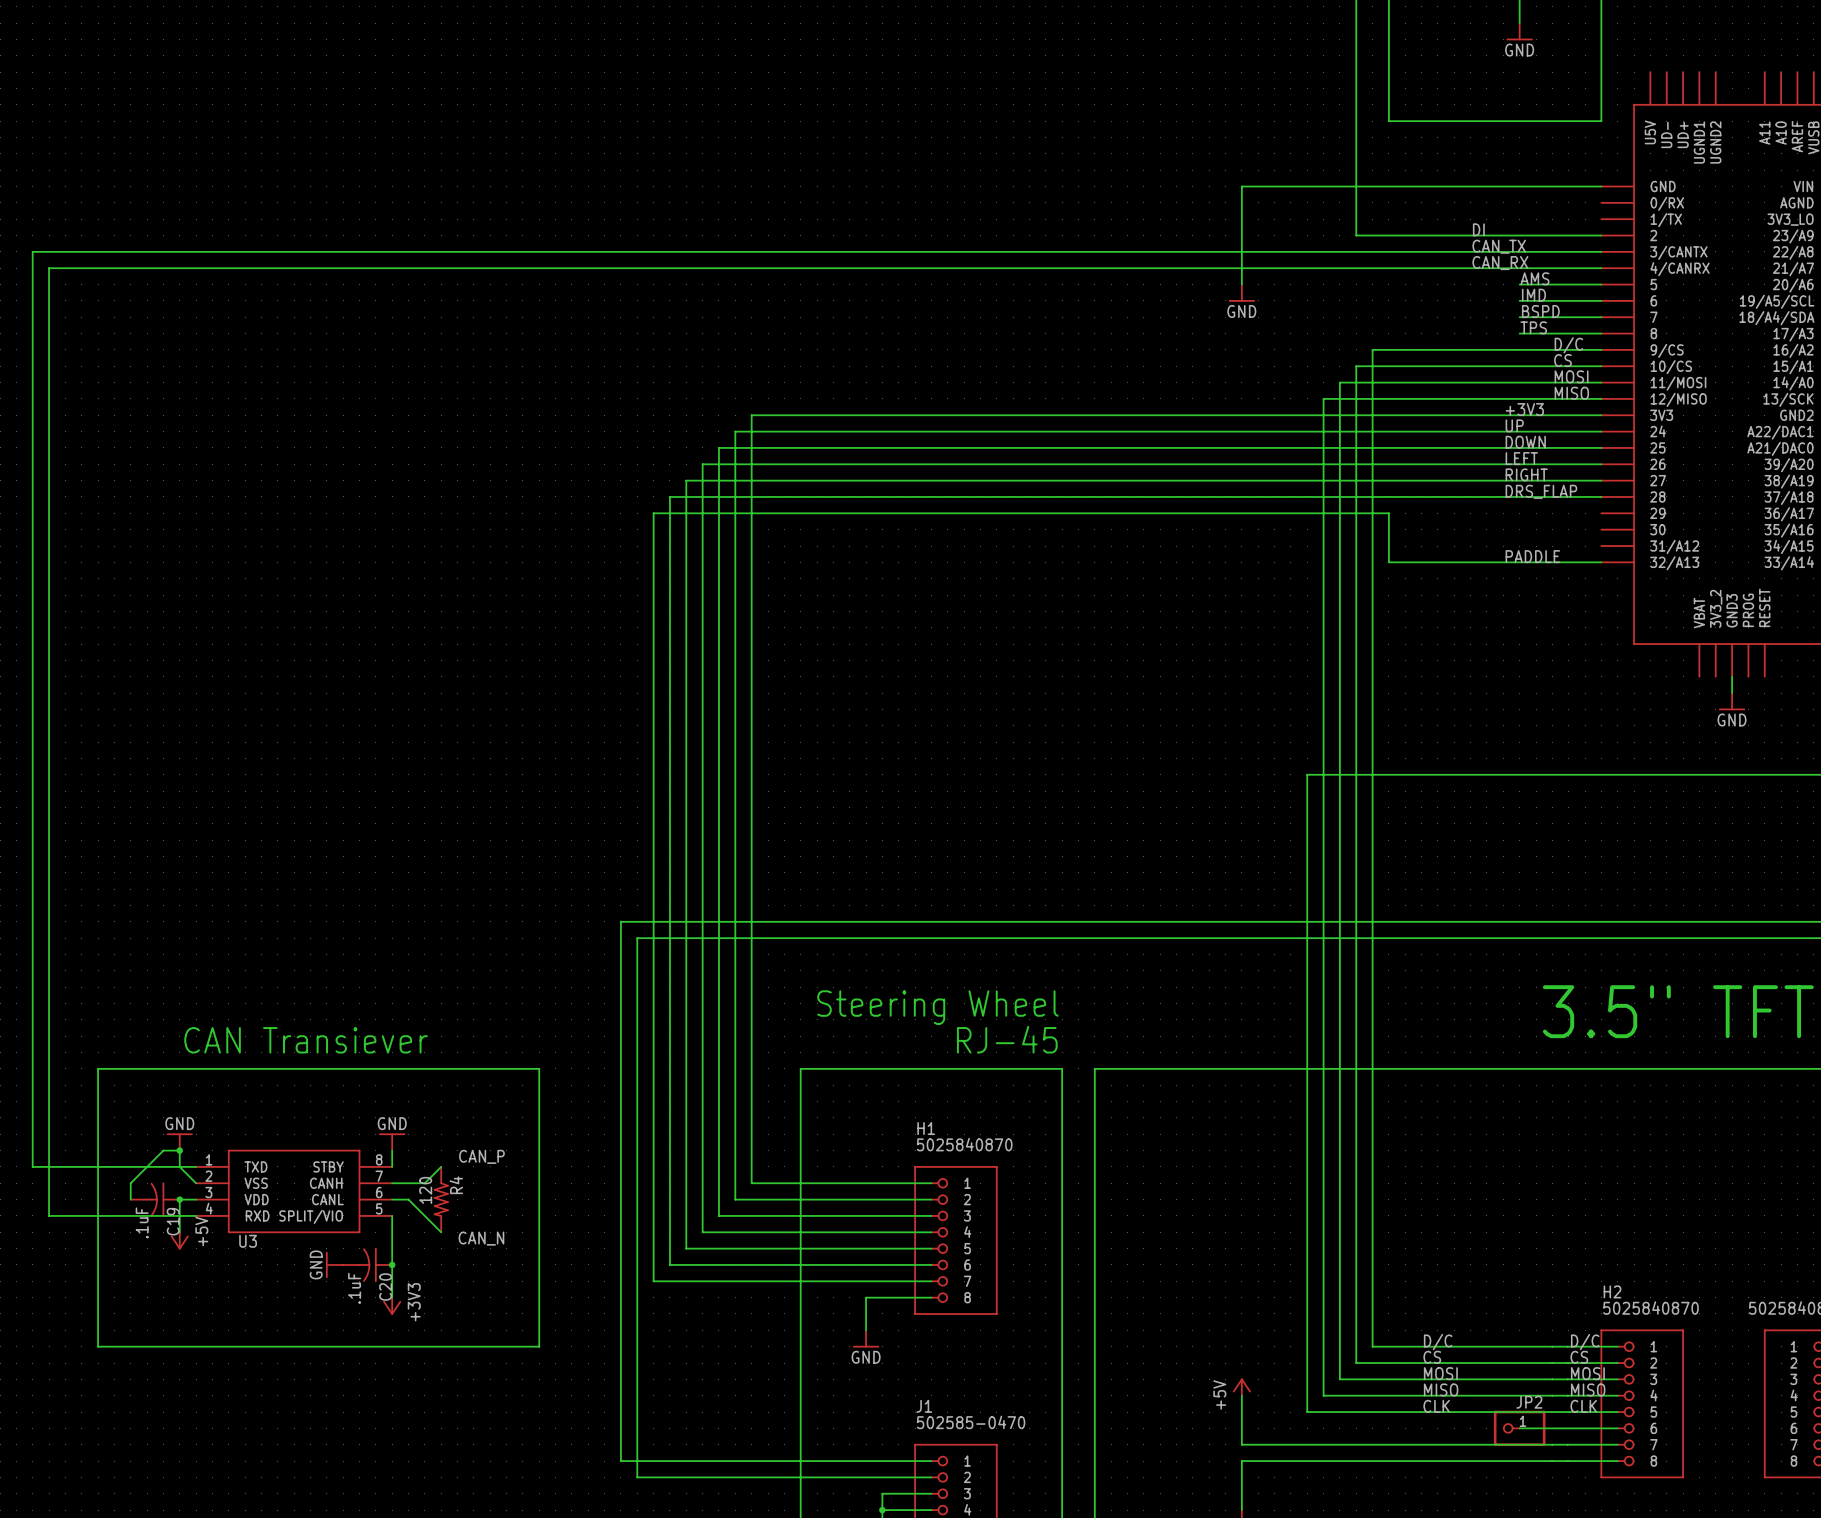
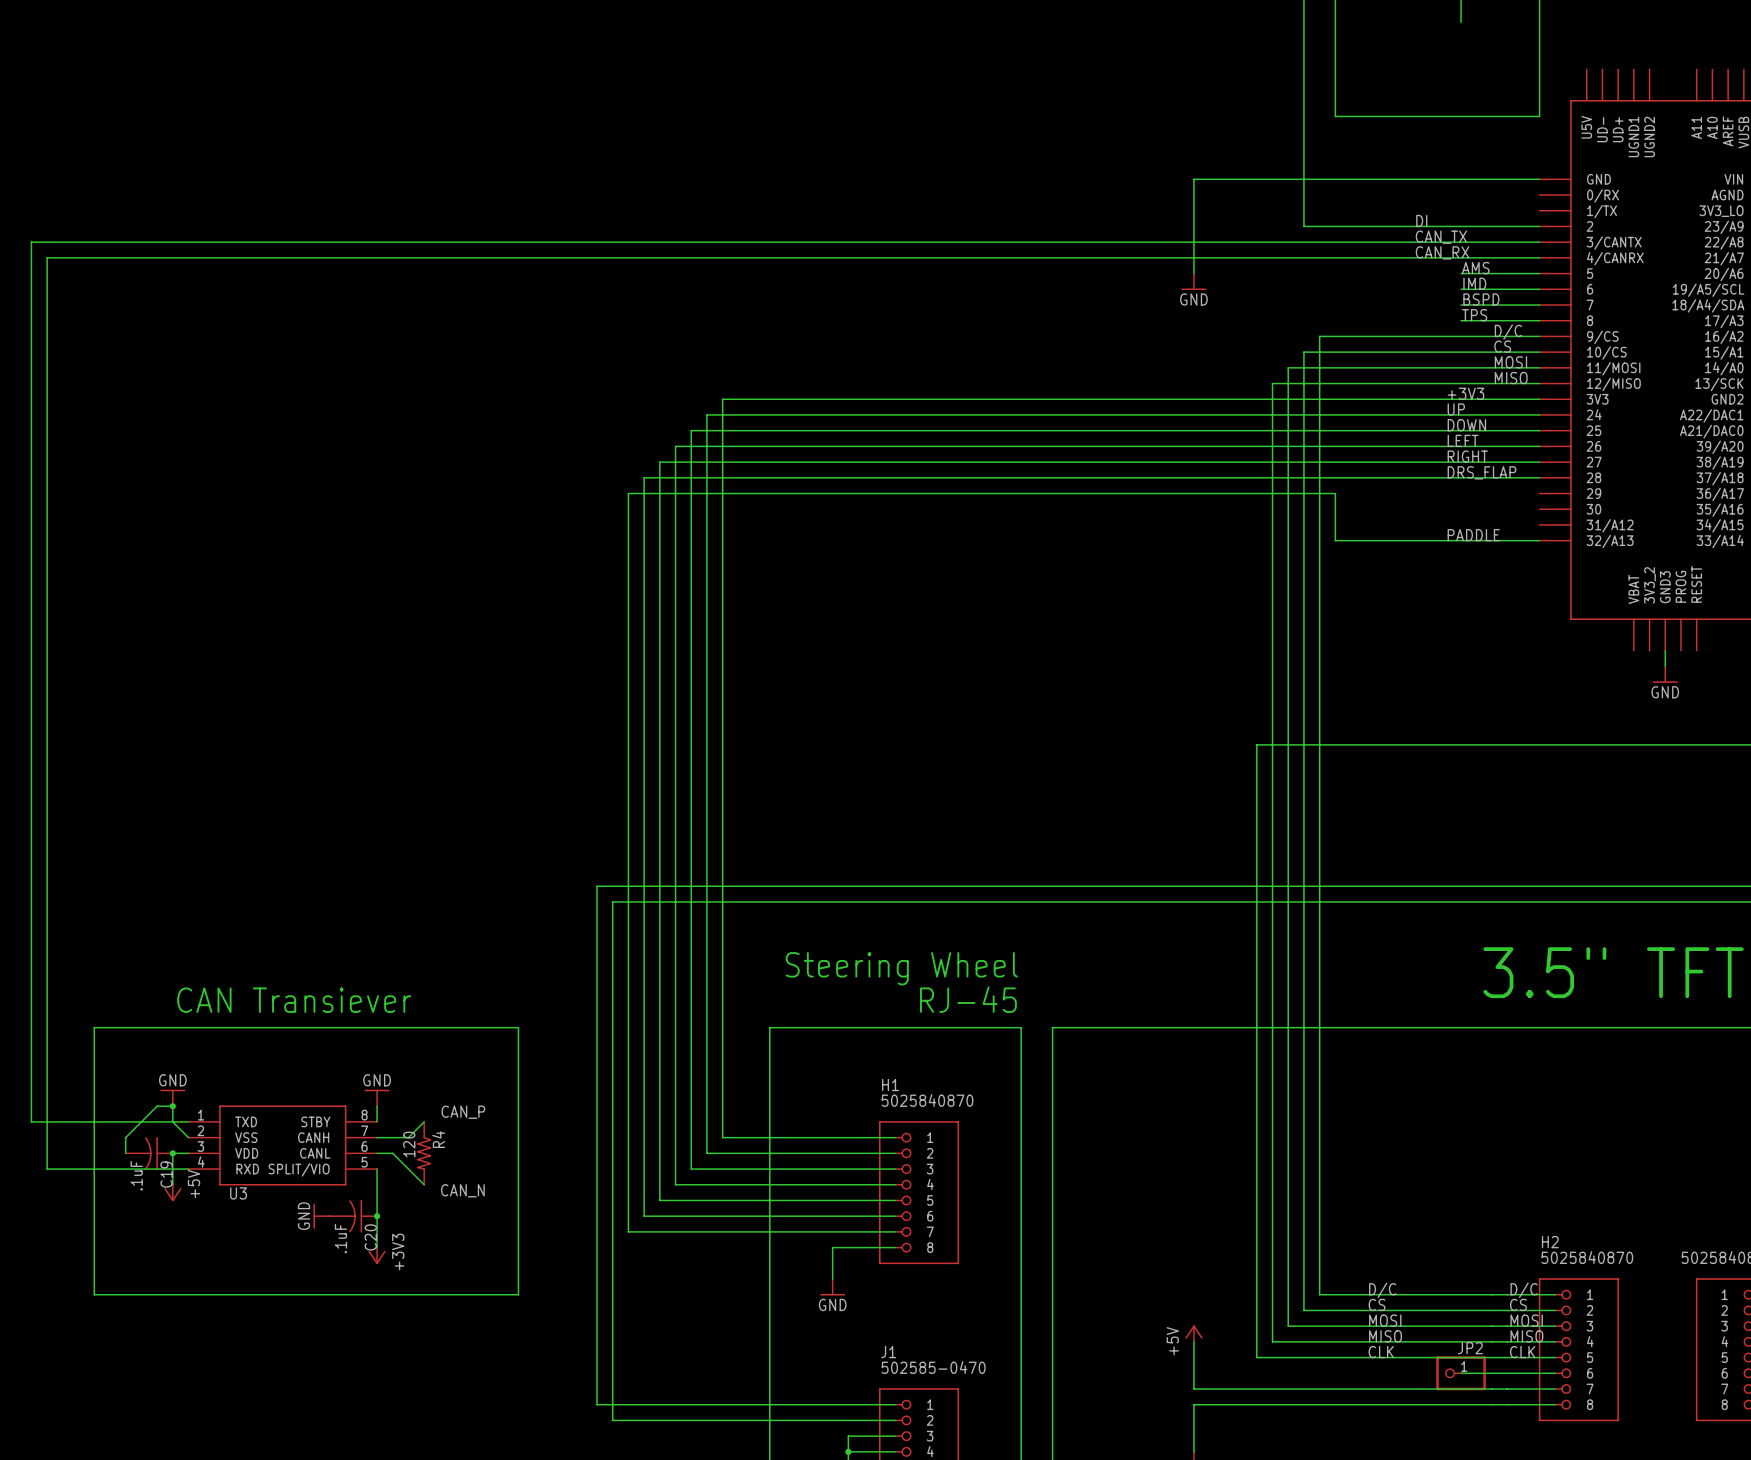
power symbol: GND (1519, 31) -> none

